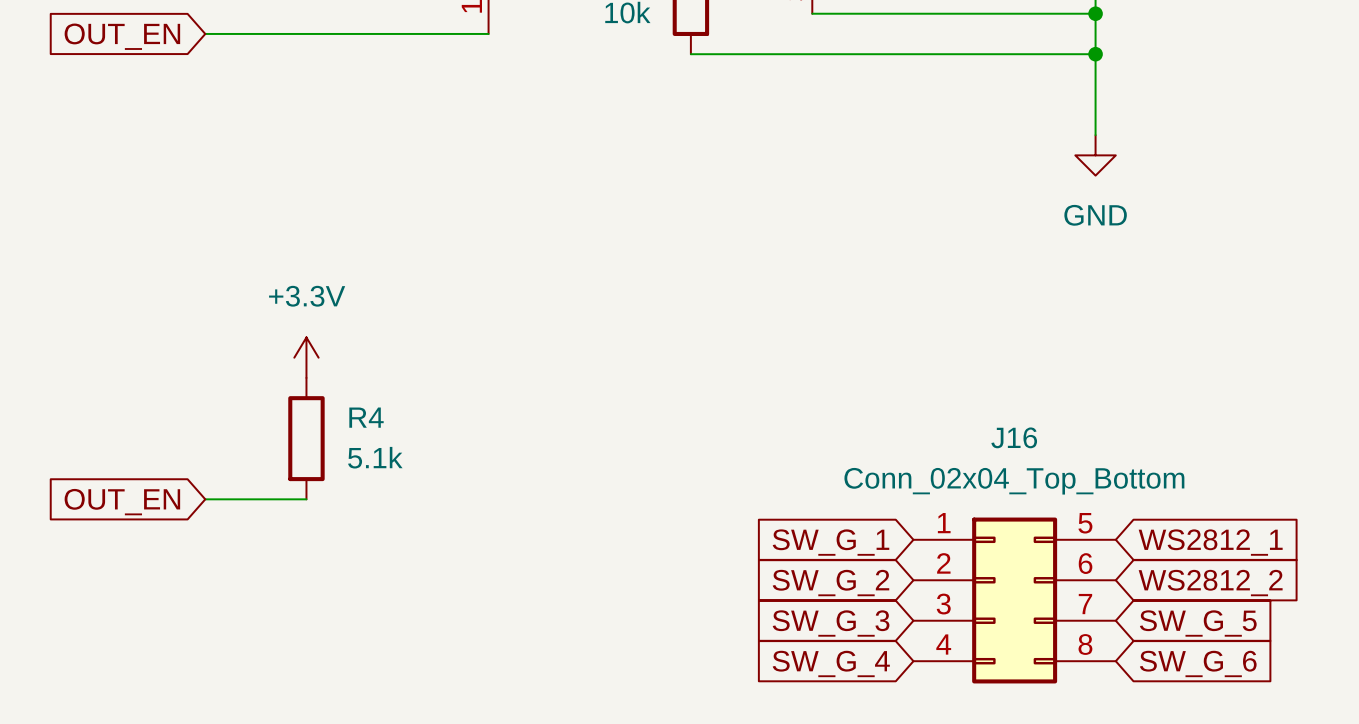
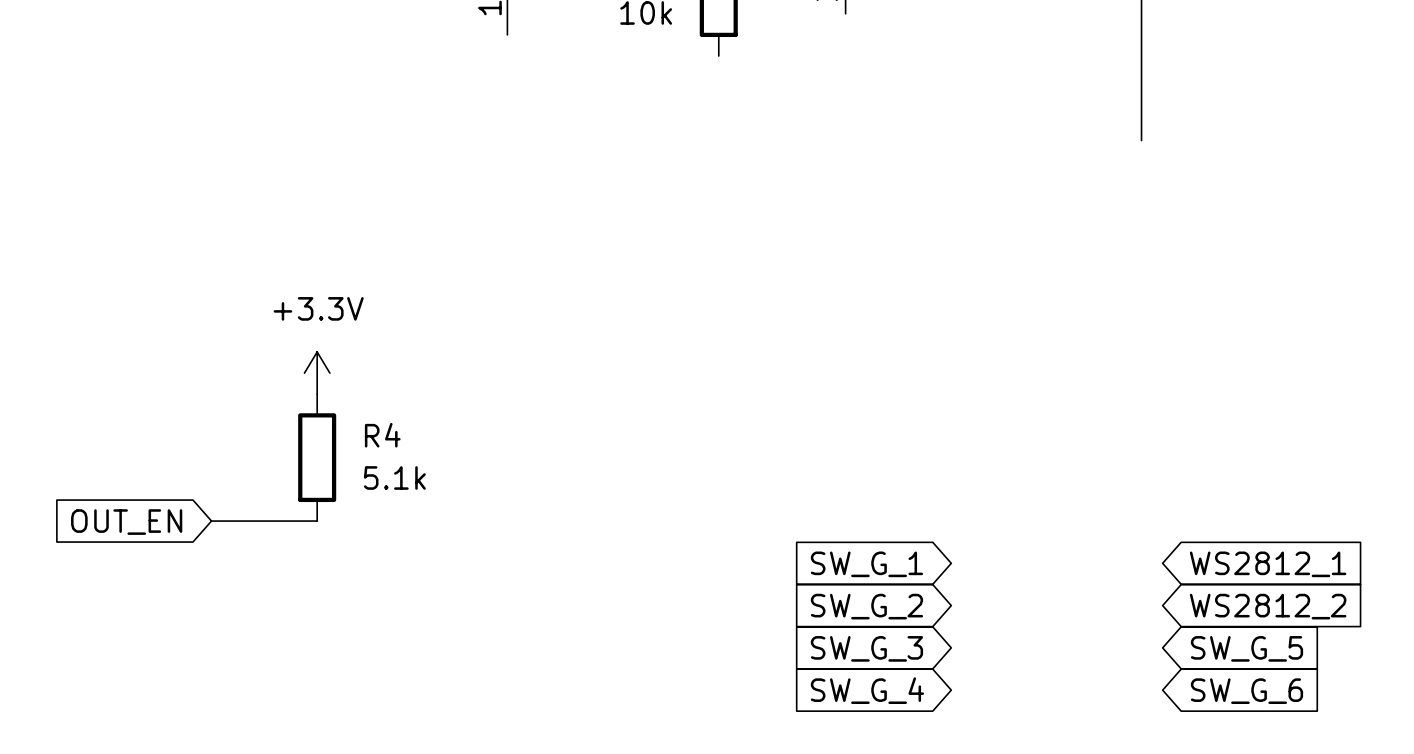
wire: (812, 13) (1095, 13) -> none
junction: (1095, 13) -> none
wire: (205, 33) (488, 33) -> none
global label: OUT_EN (122, 36) -> none
wire: (690, 54) (1095, 54) -> none
junction: (1095, 54) -> none
power symbol: GND (1095, 155) -> none
J16: Conn_02x04_Top_Bottom (1014, 600) -> none

